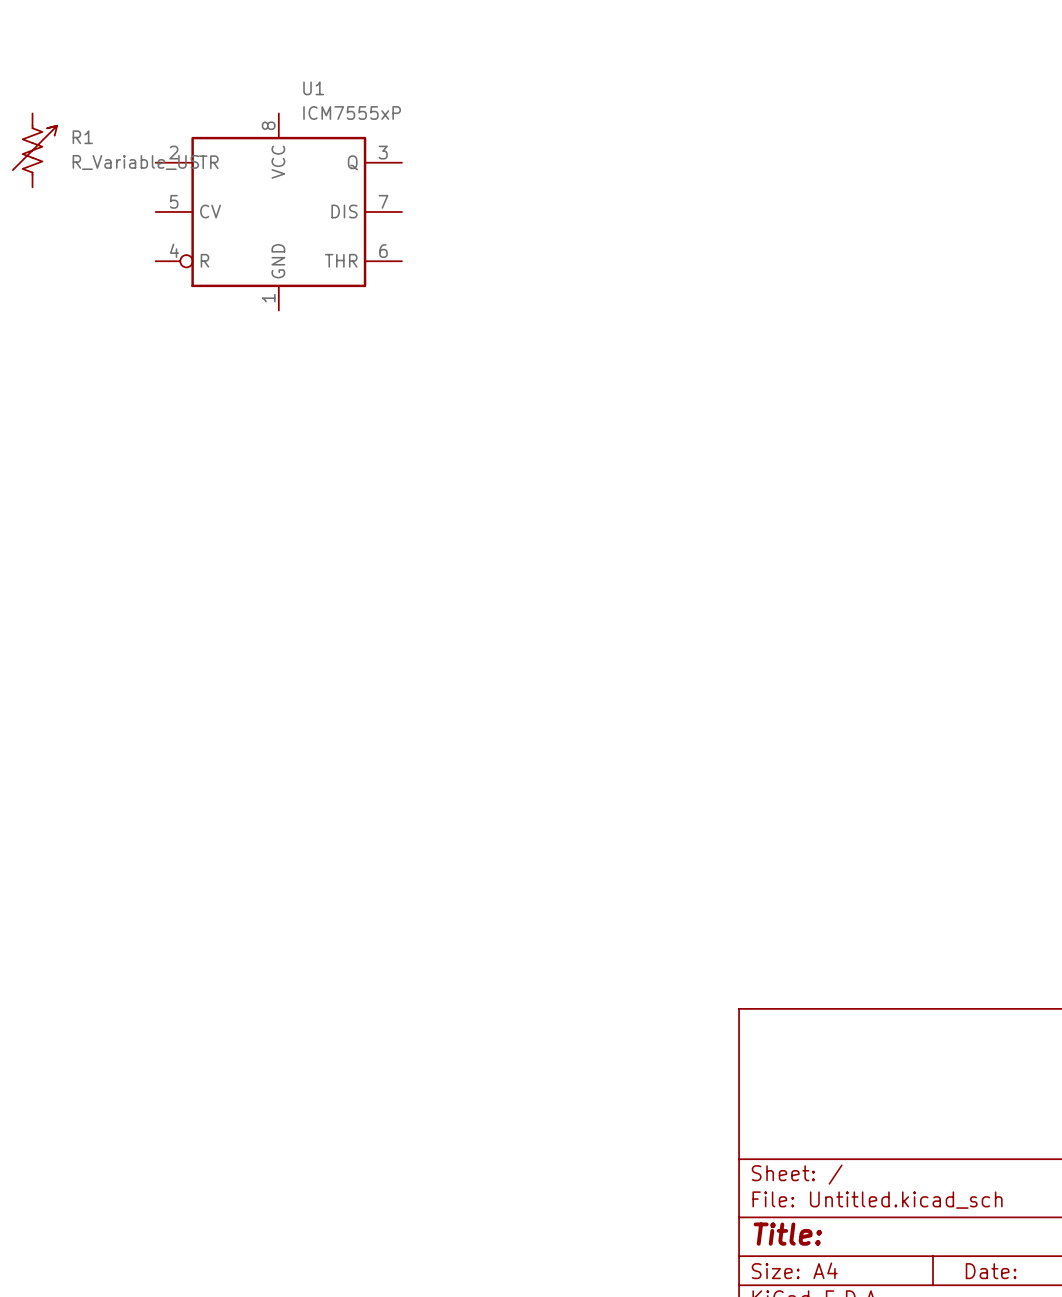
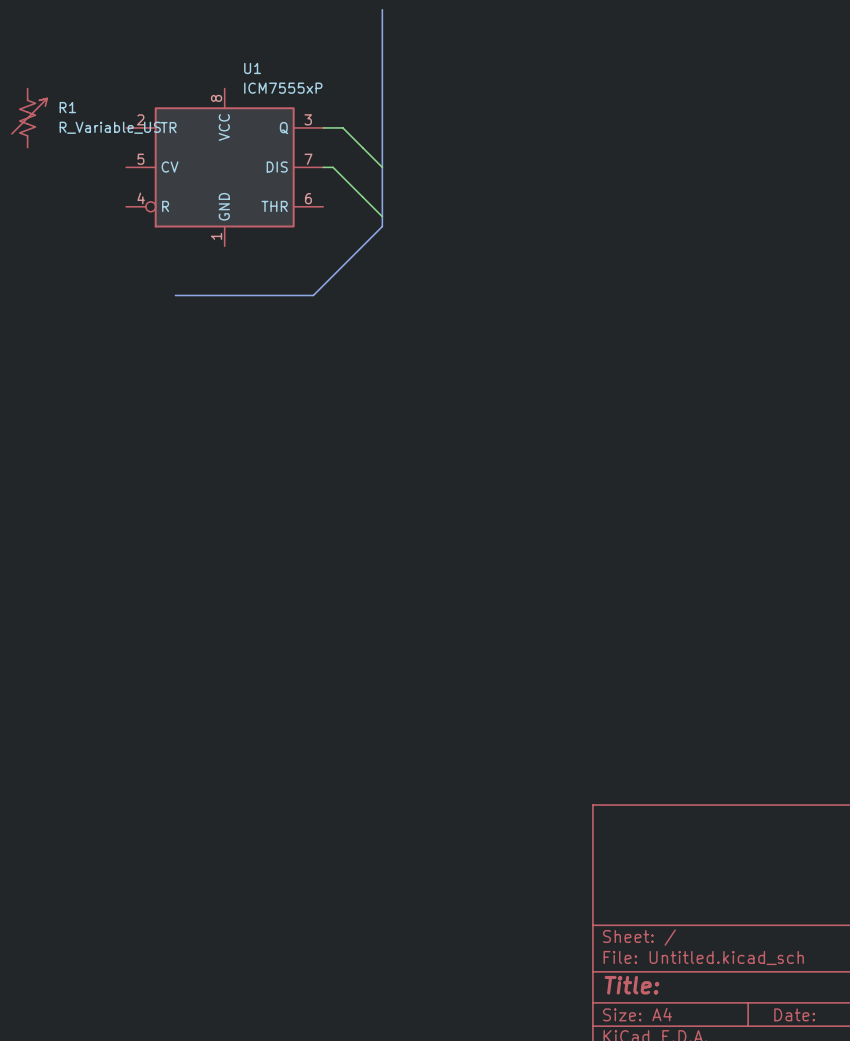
bus: none -> (382, 9) (382, 226) (313, 295) (175, 295)
wire: none -> (323, 127) (342, 127) (382, 167)
wire: none -> (323, 167) (333, 167) (382, 216)

